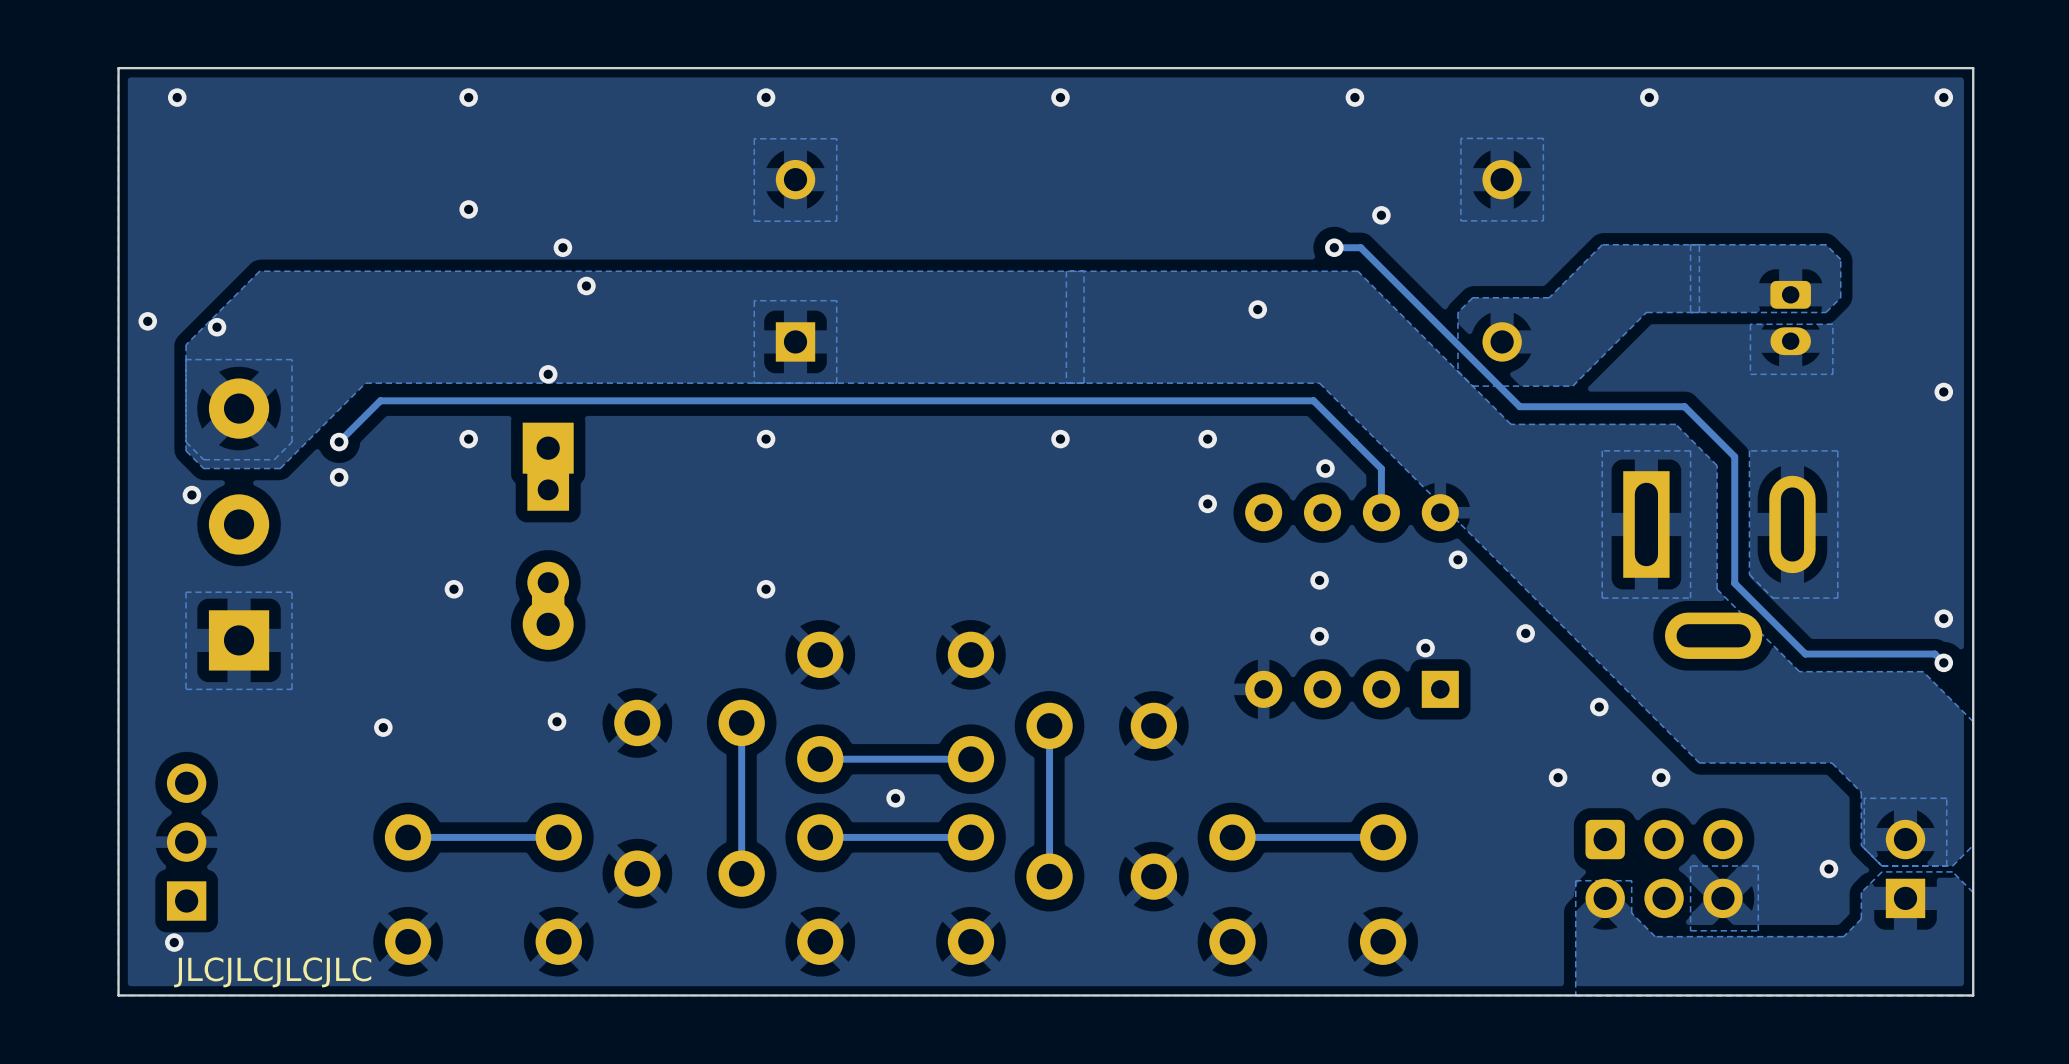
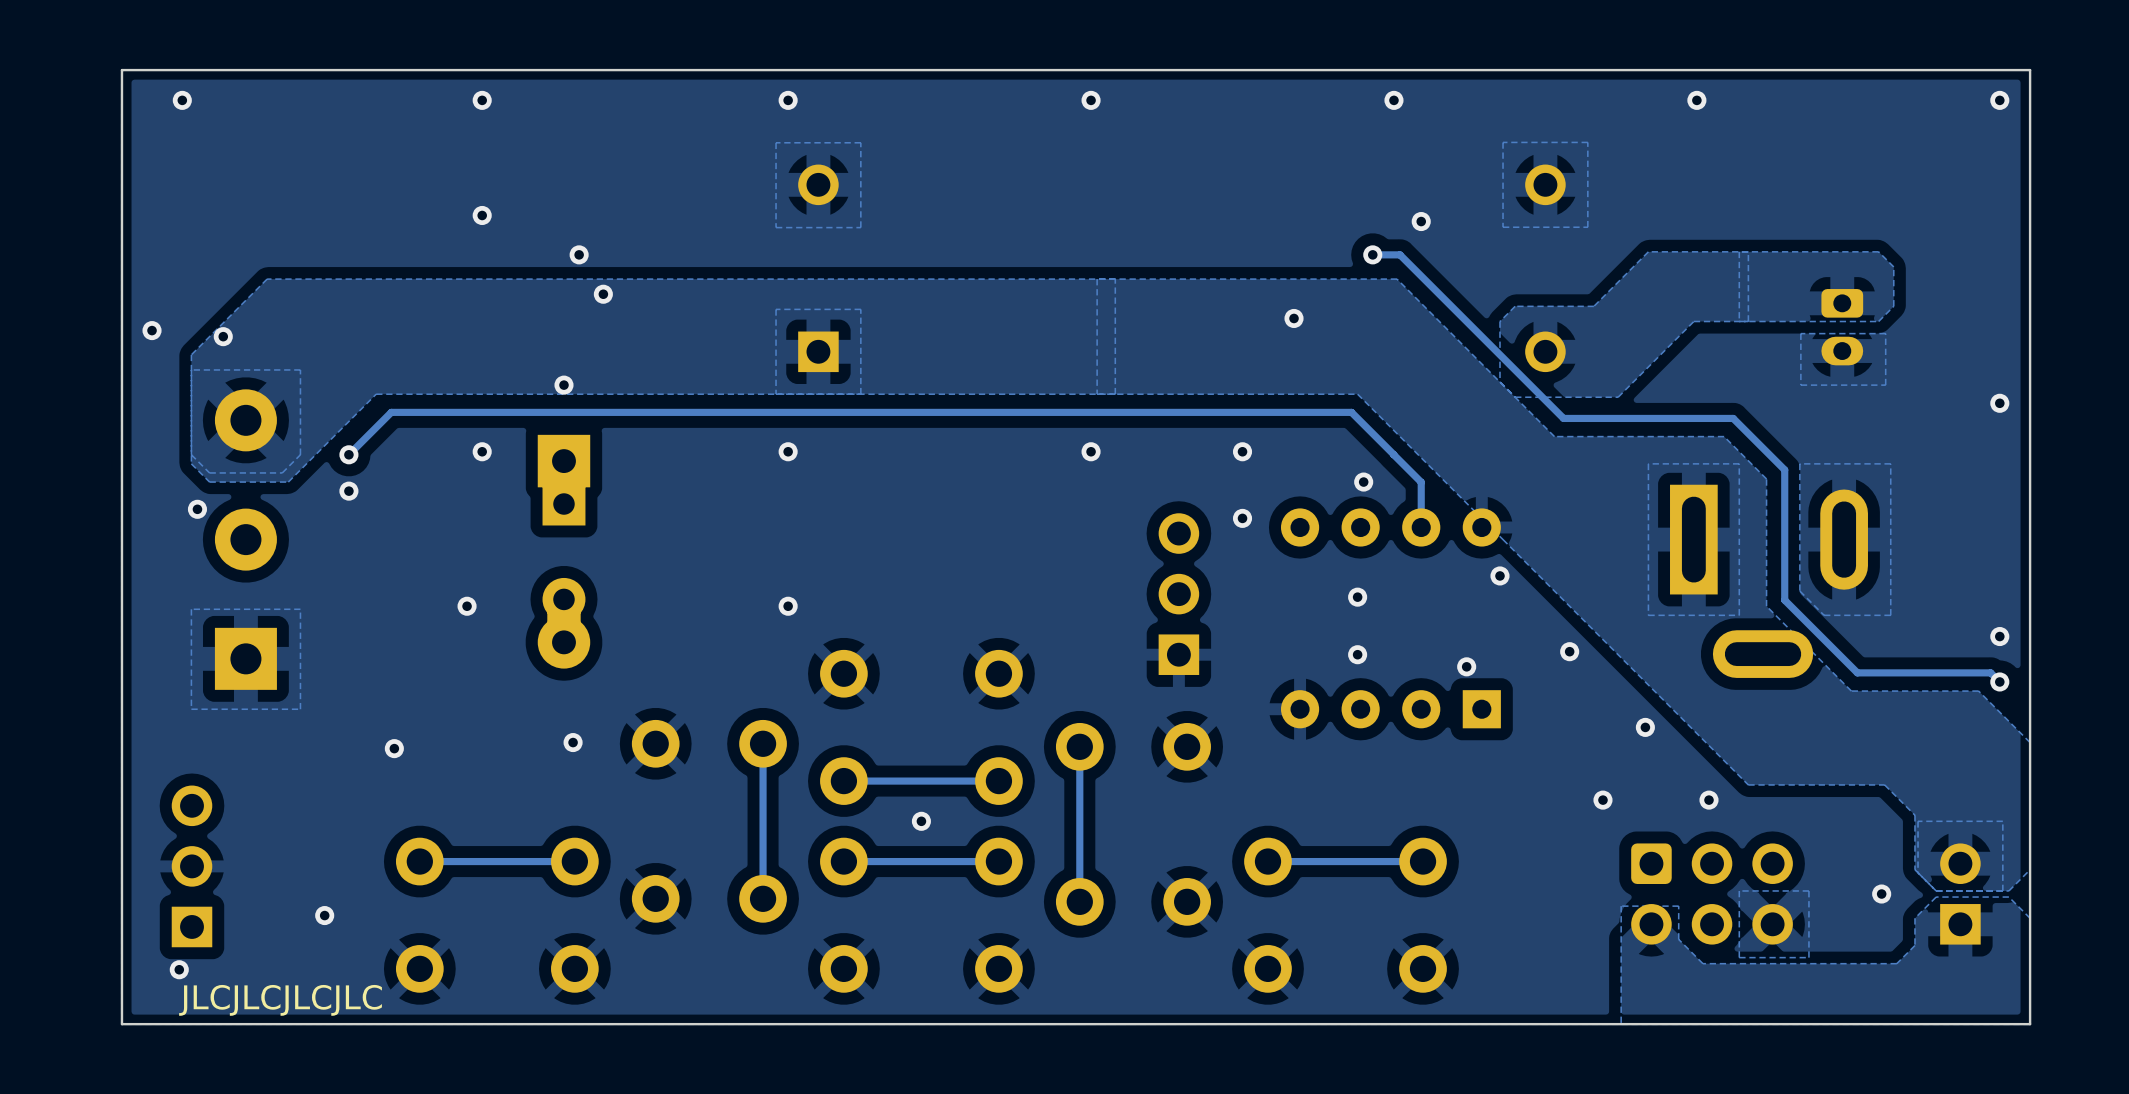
part: none -> (1178, 594)
via: none -> (324, 915)

